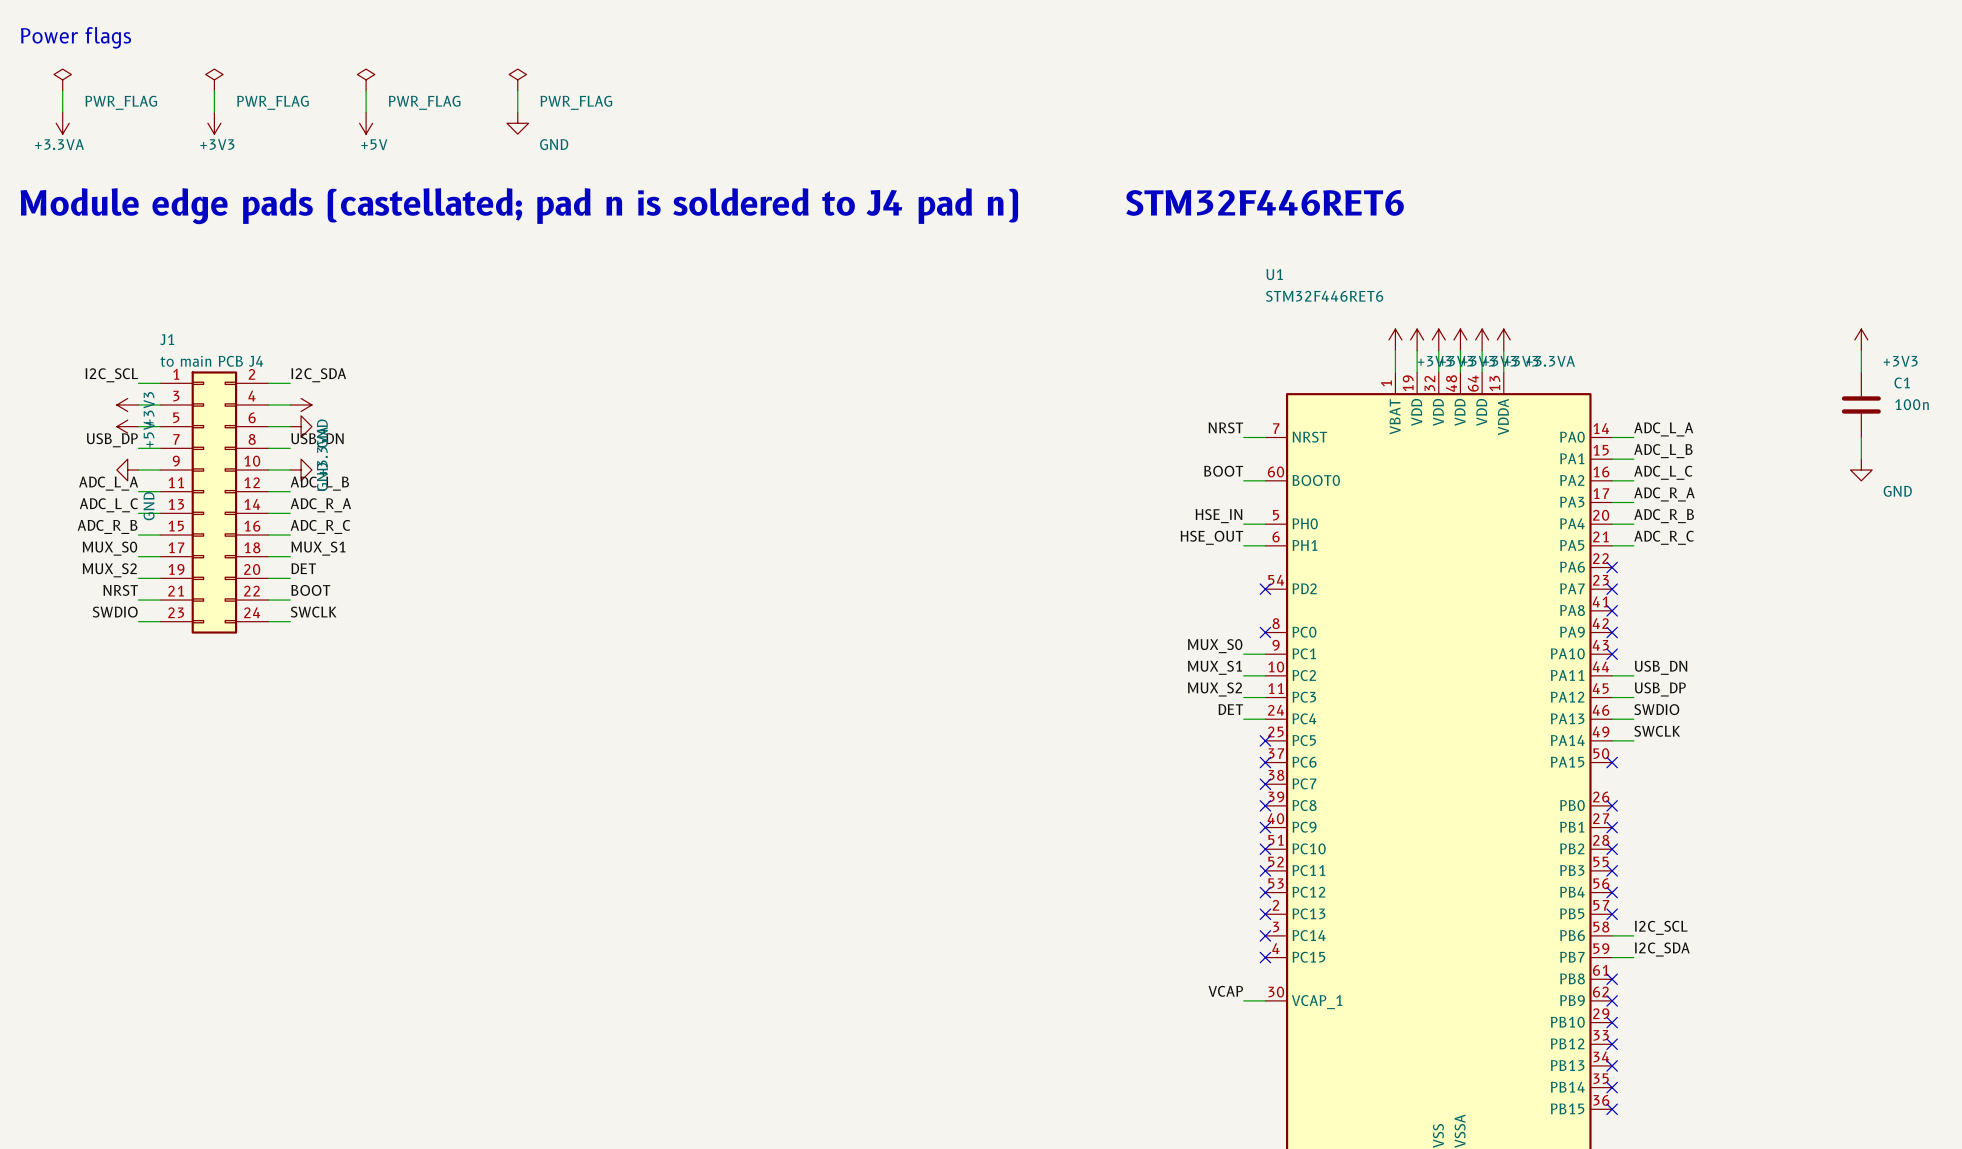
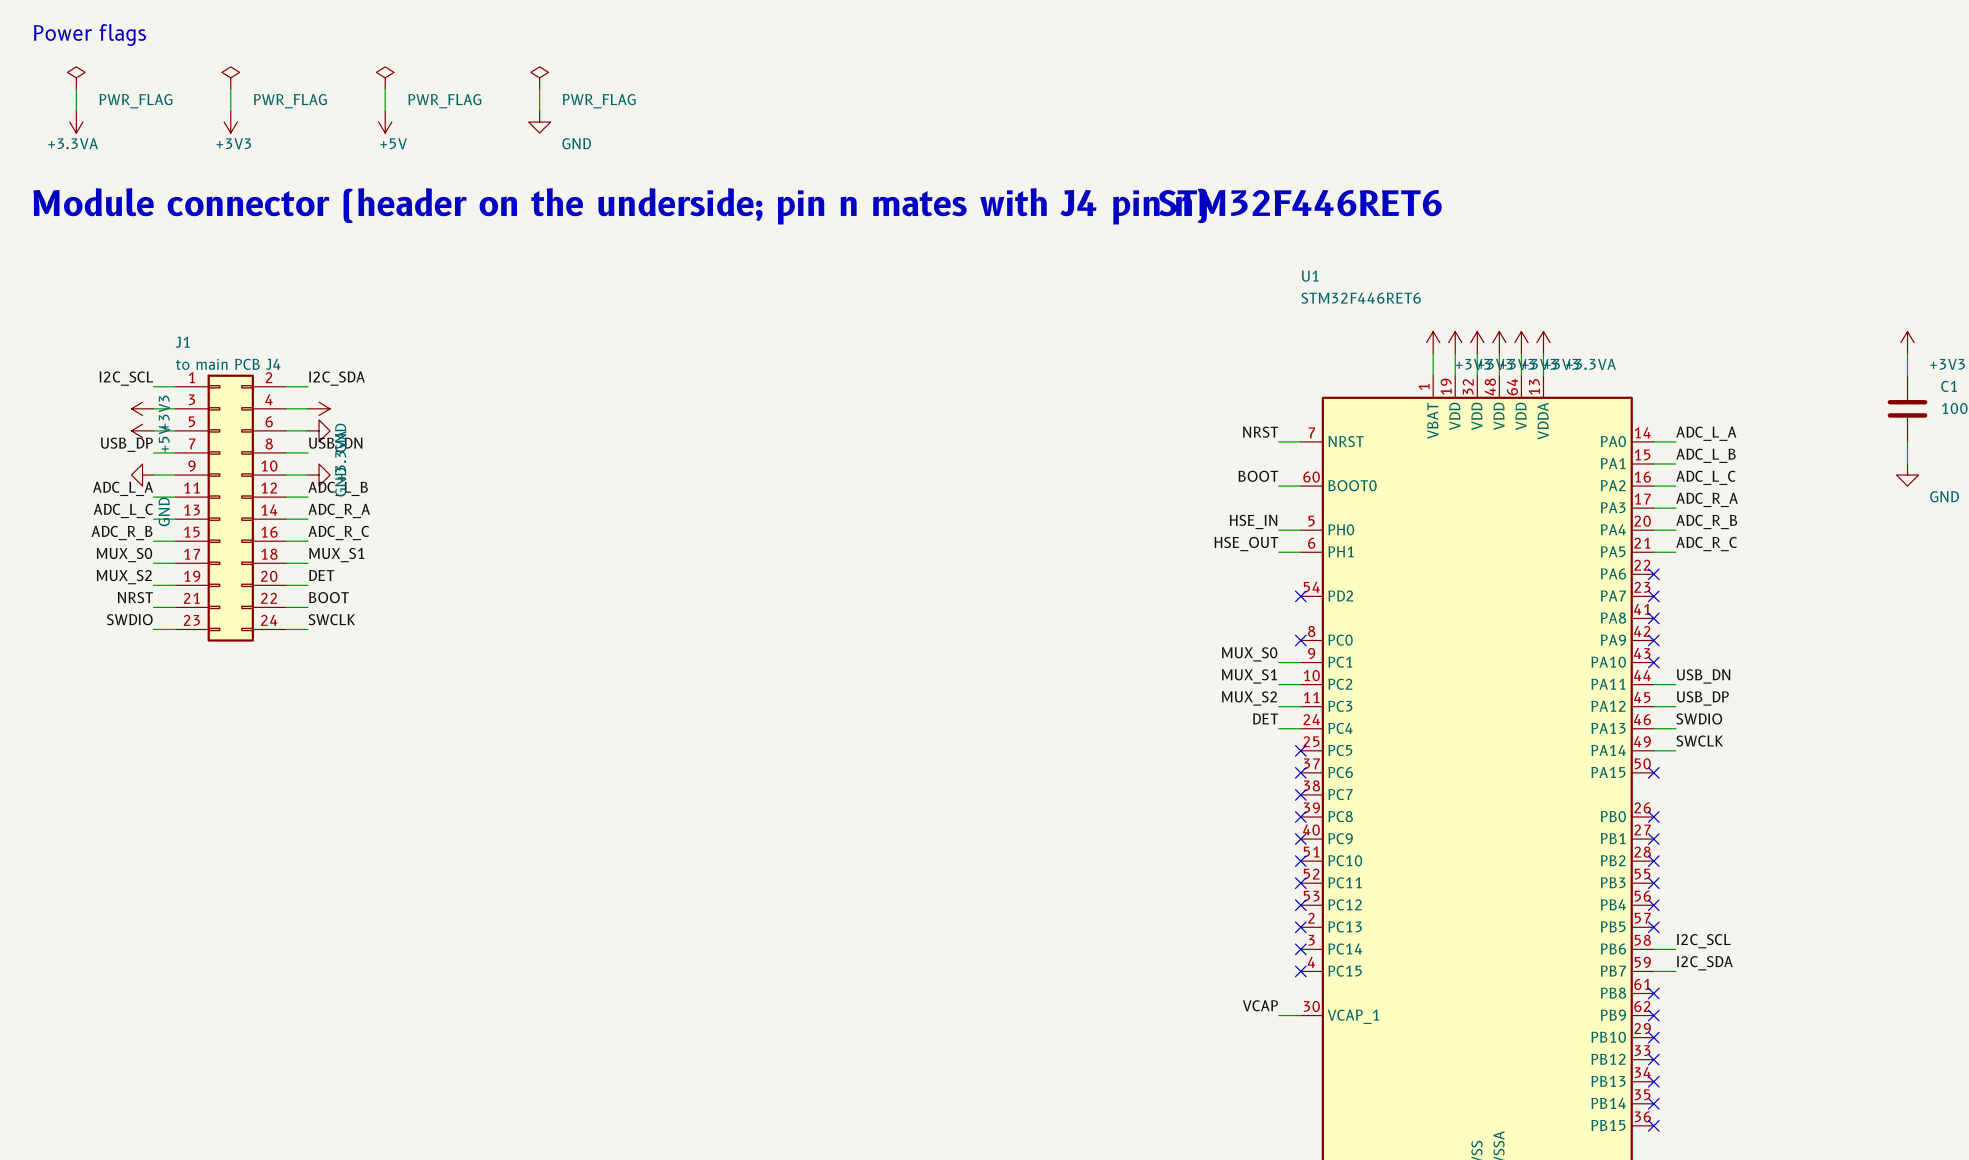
text: Module edge pads (castellated; pad n is soldered to J4 pad n) (519, 206) -> Module connector (header on the underside; pin n mates with J4 pin n) (620, 206)

